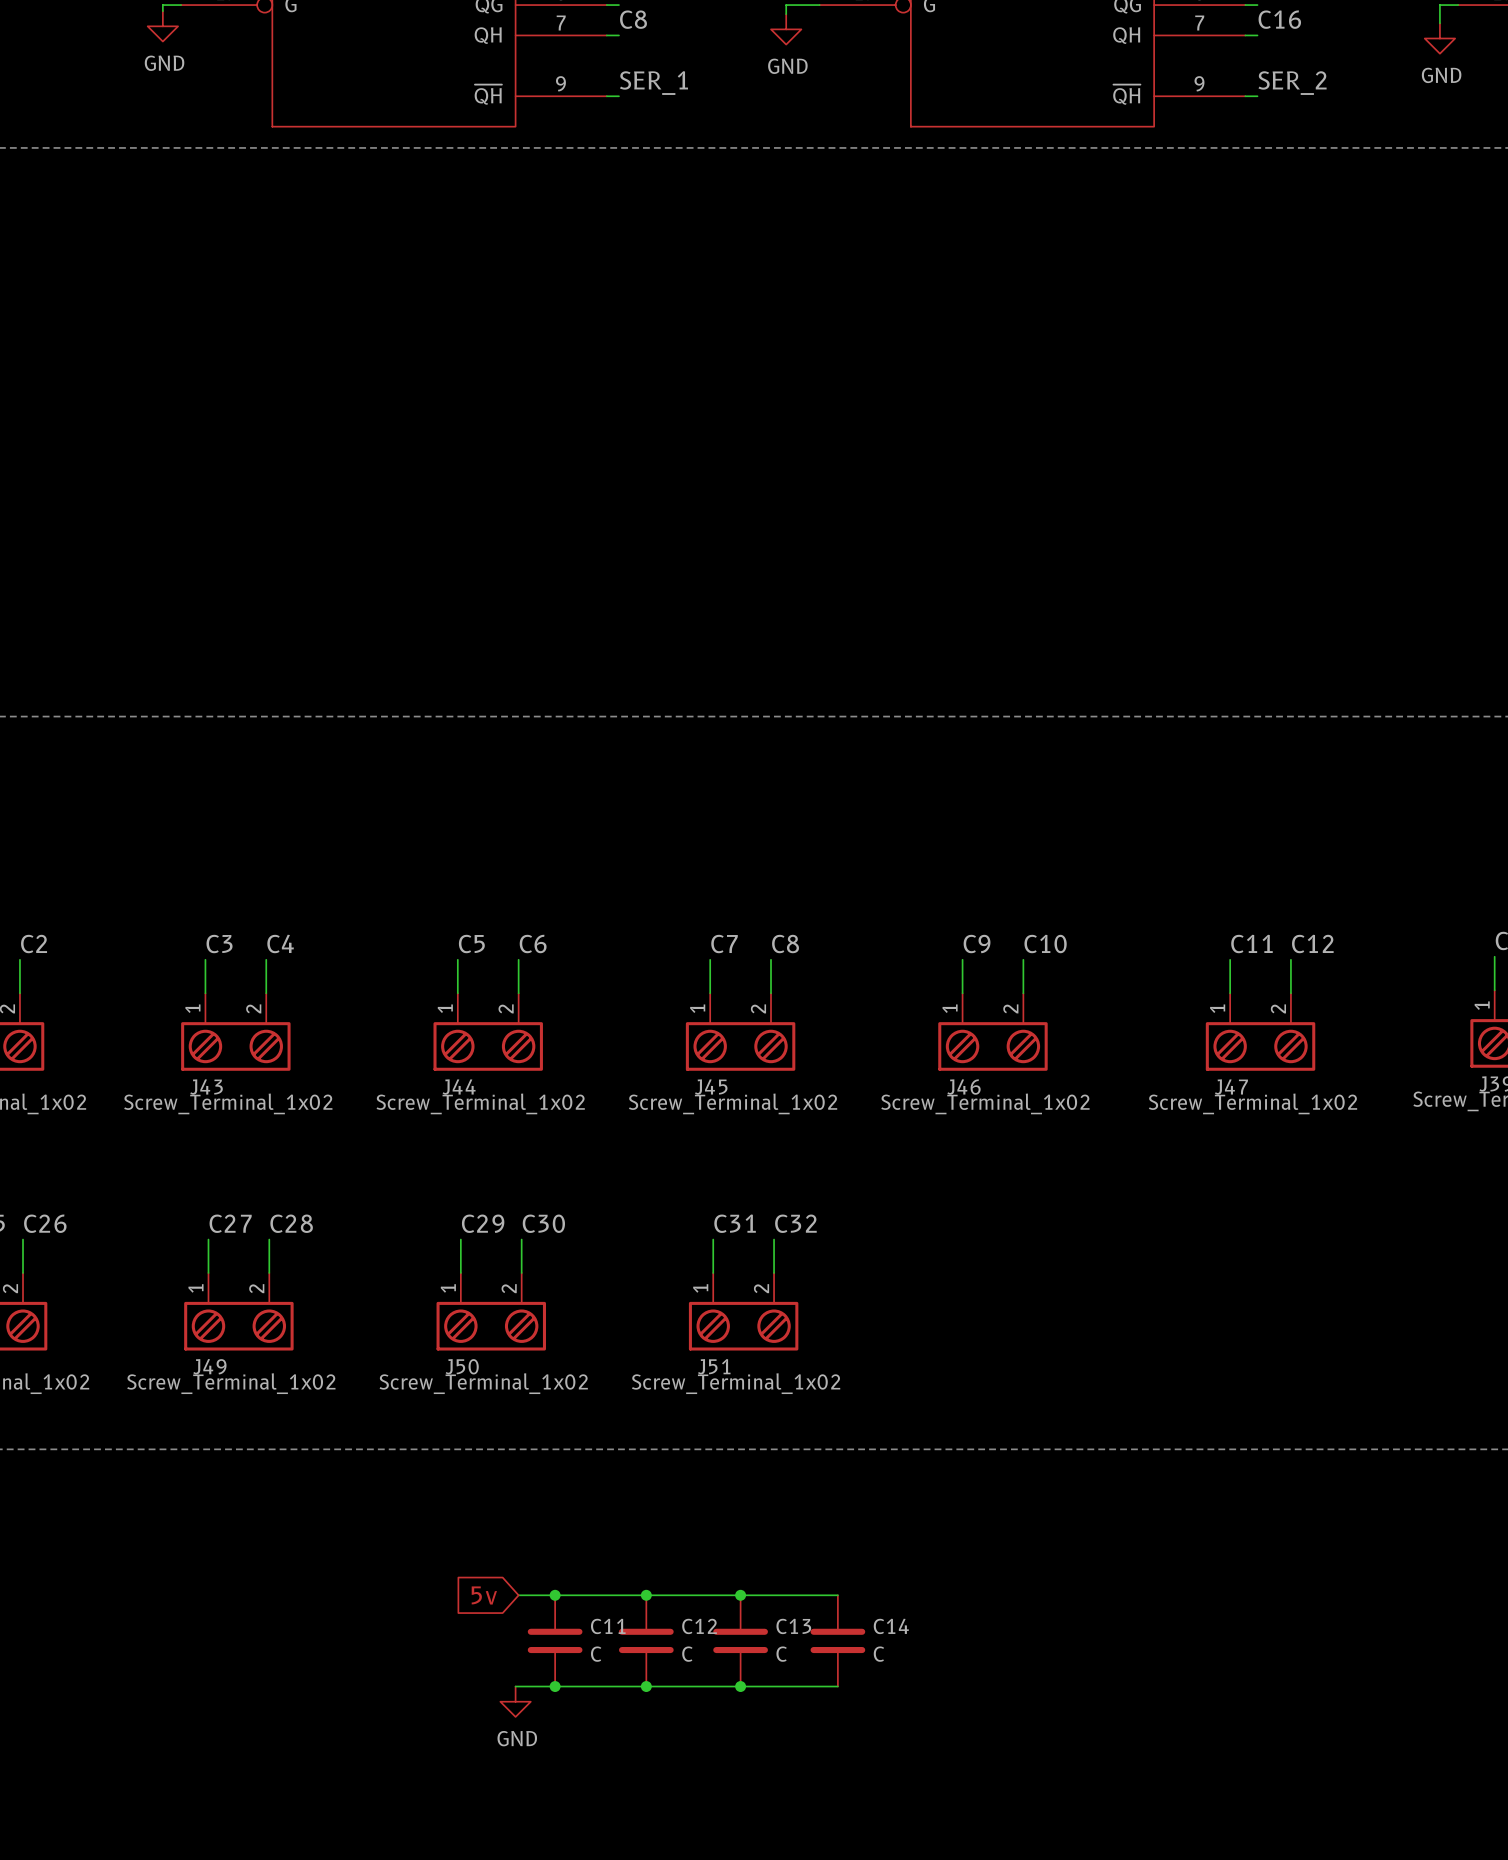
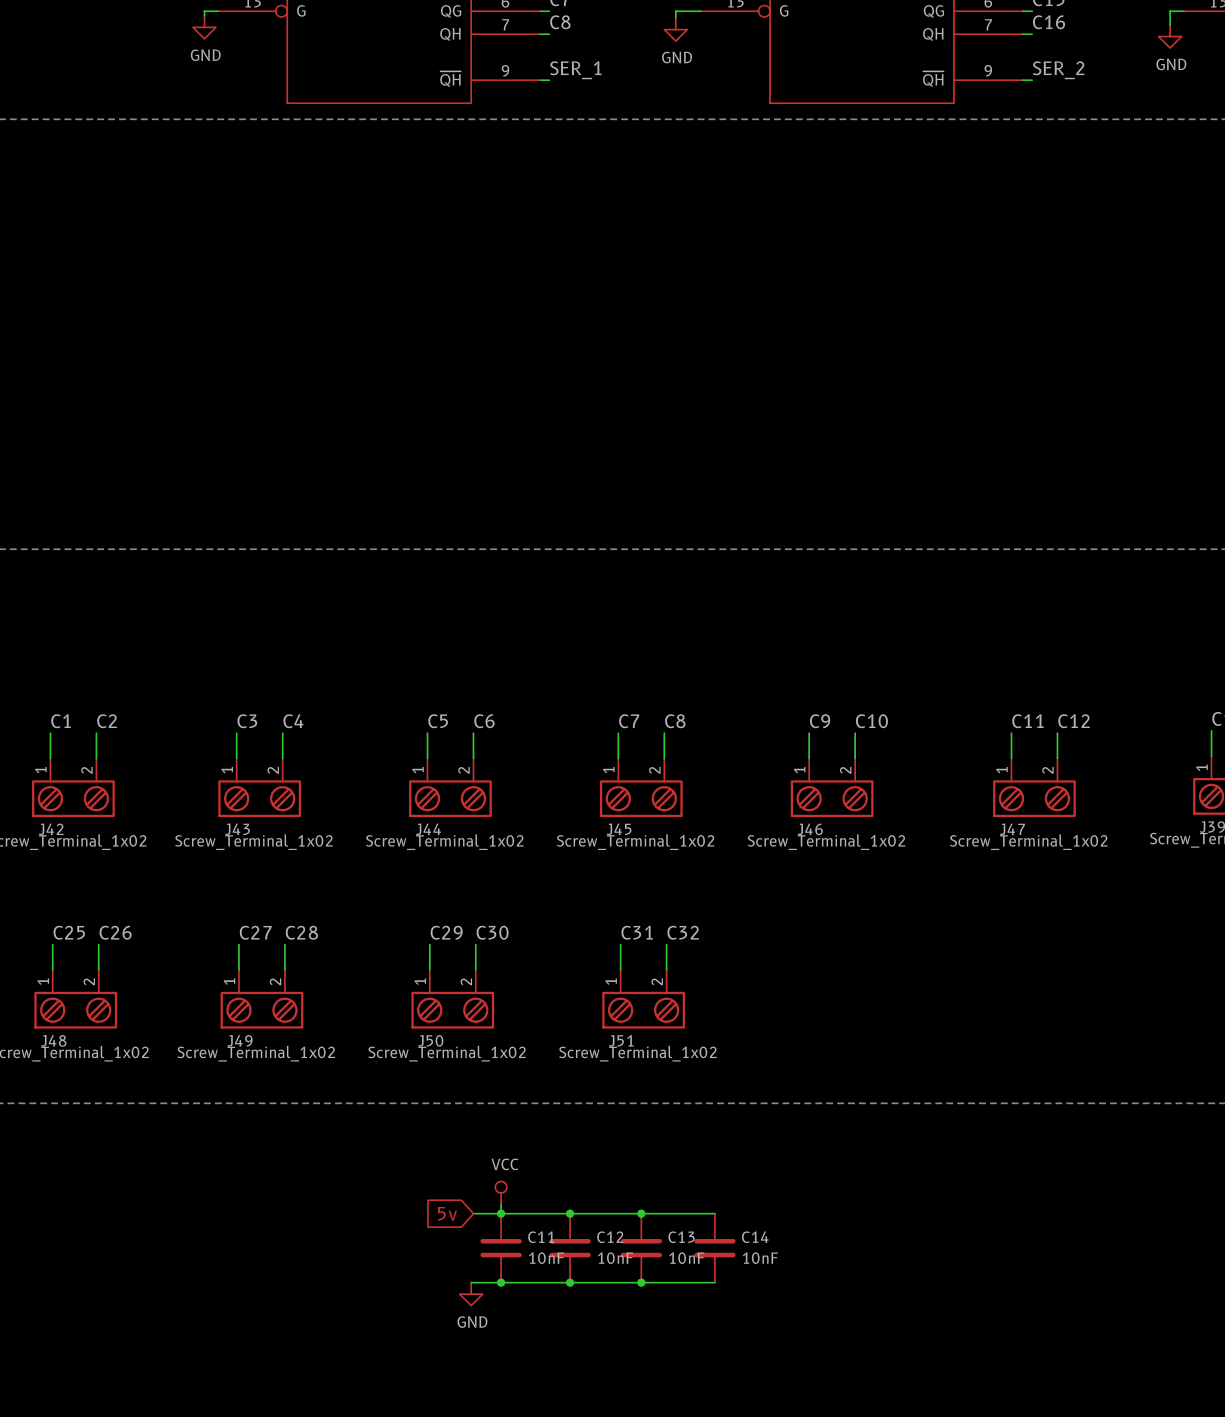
power symbol: none -> VCC (501, 1193)
wire: none -> (501, 1204) (501, 1213)
C11 value: C (596, 1654) -> 10nF (546, 1258)
C12 value: C (687, 1654) -> 10nF (615, 1258)
C13 value: C (781, 1654) -> 10nF (686, 1258)
C14 value: C (878, 1654) -> 10nF (760, 1258)

